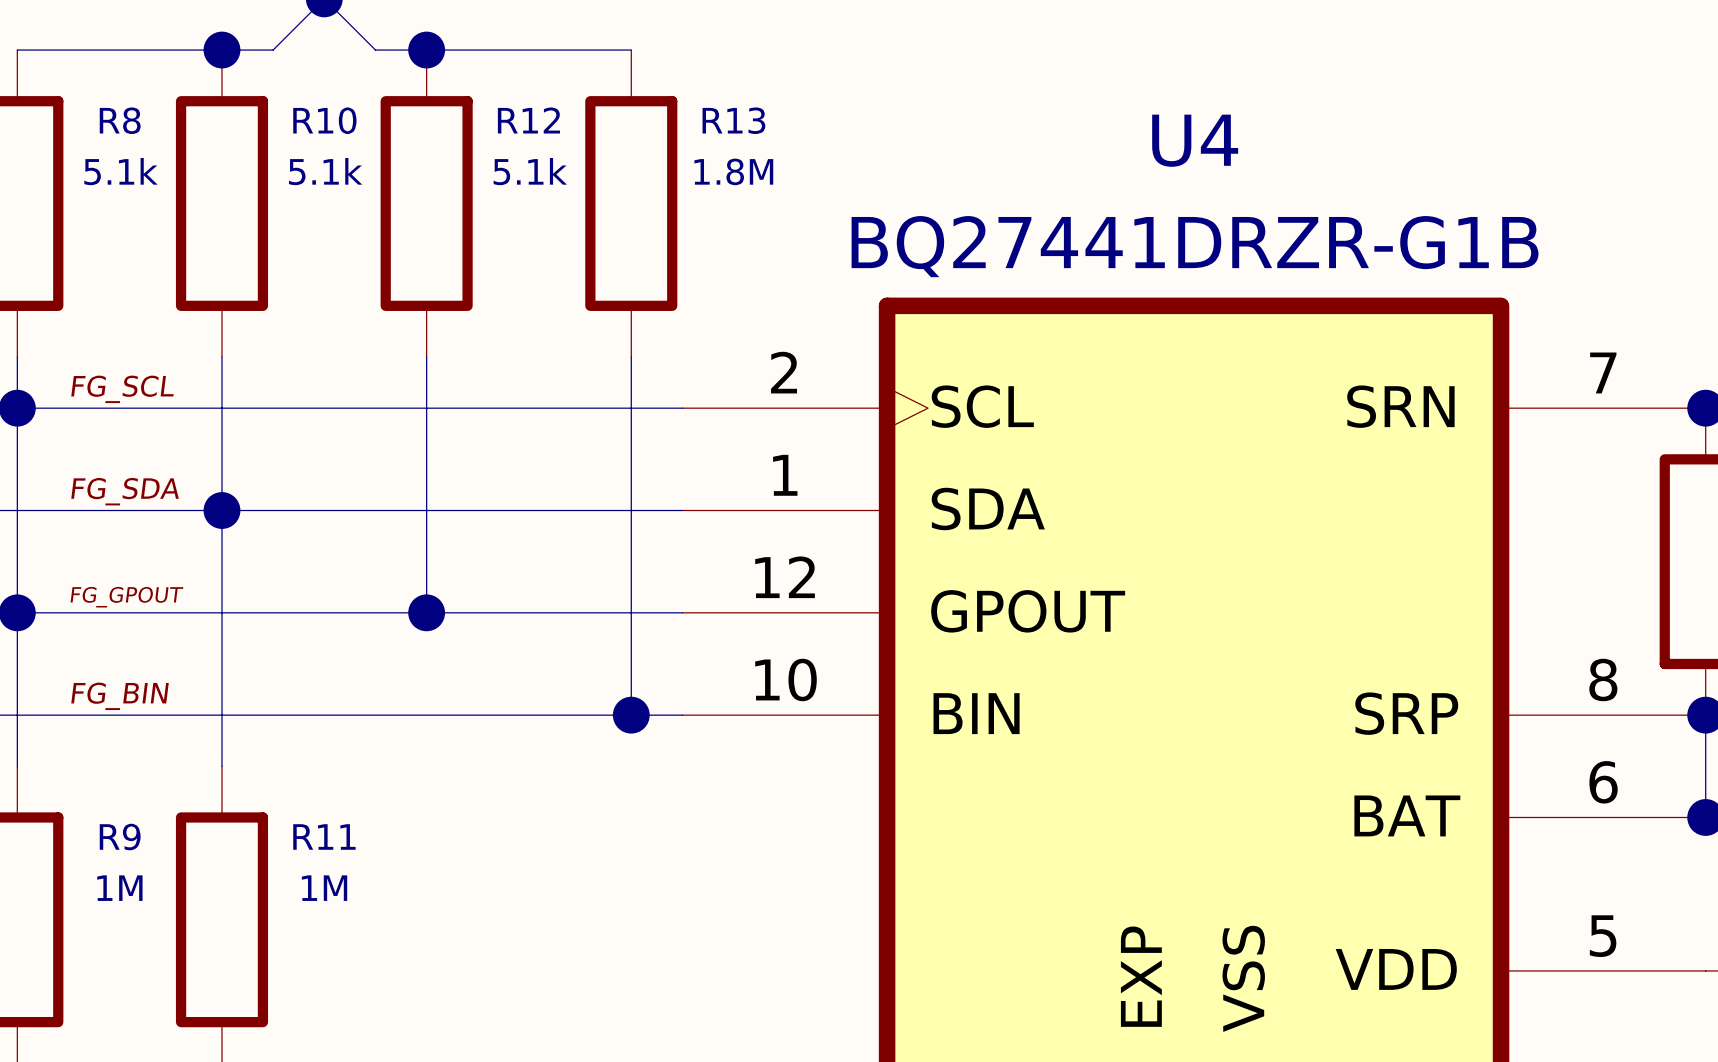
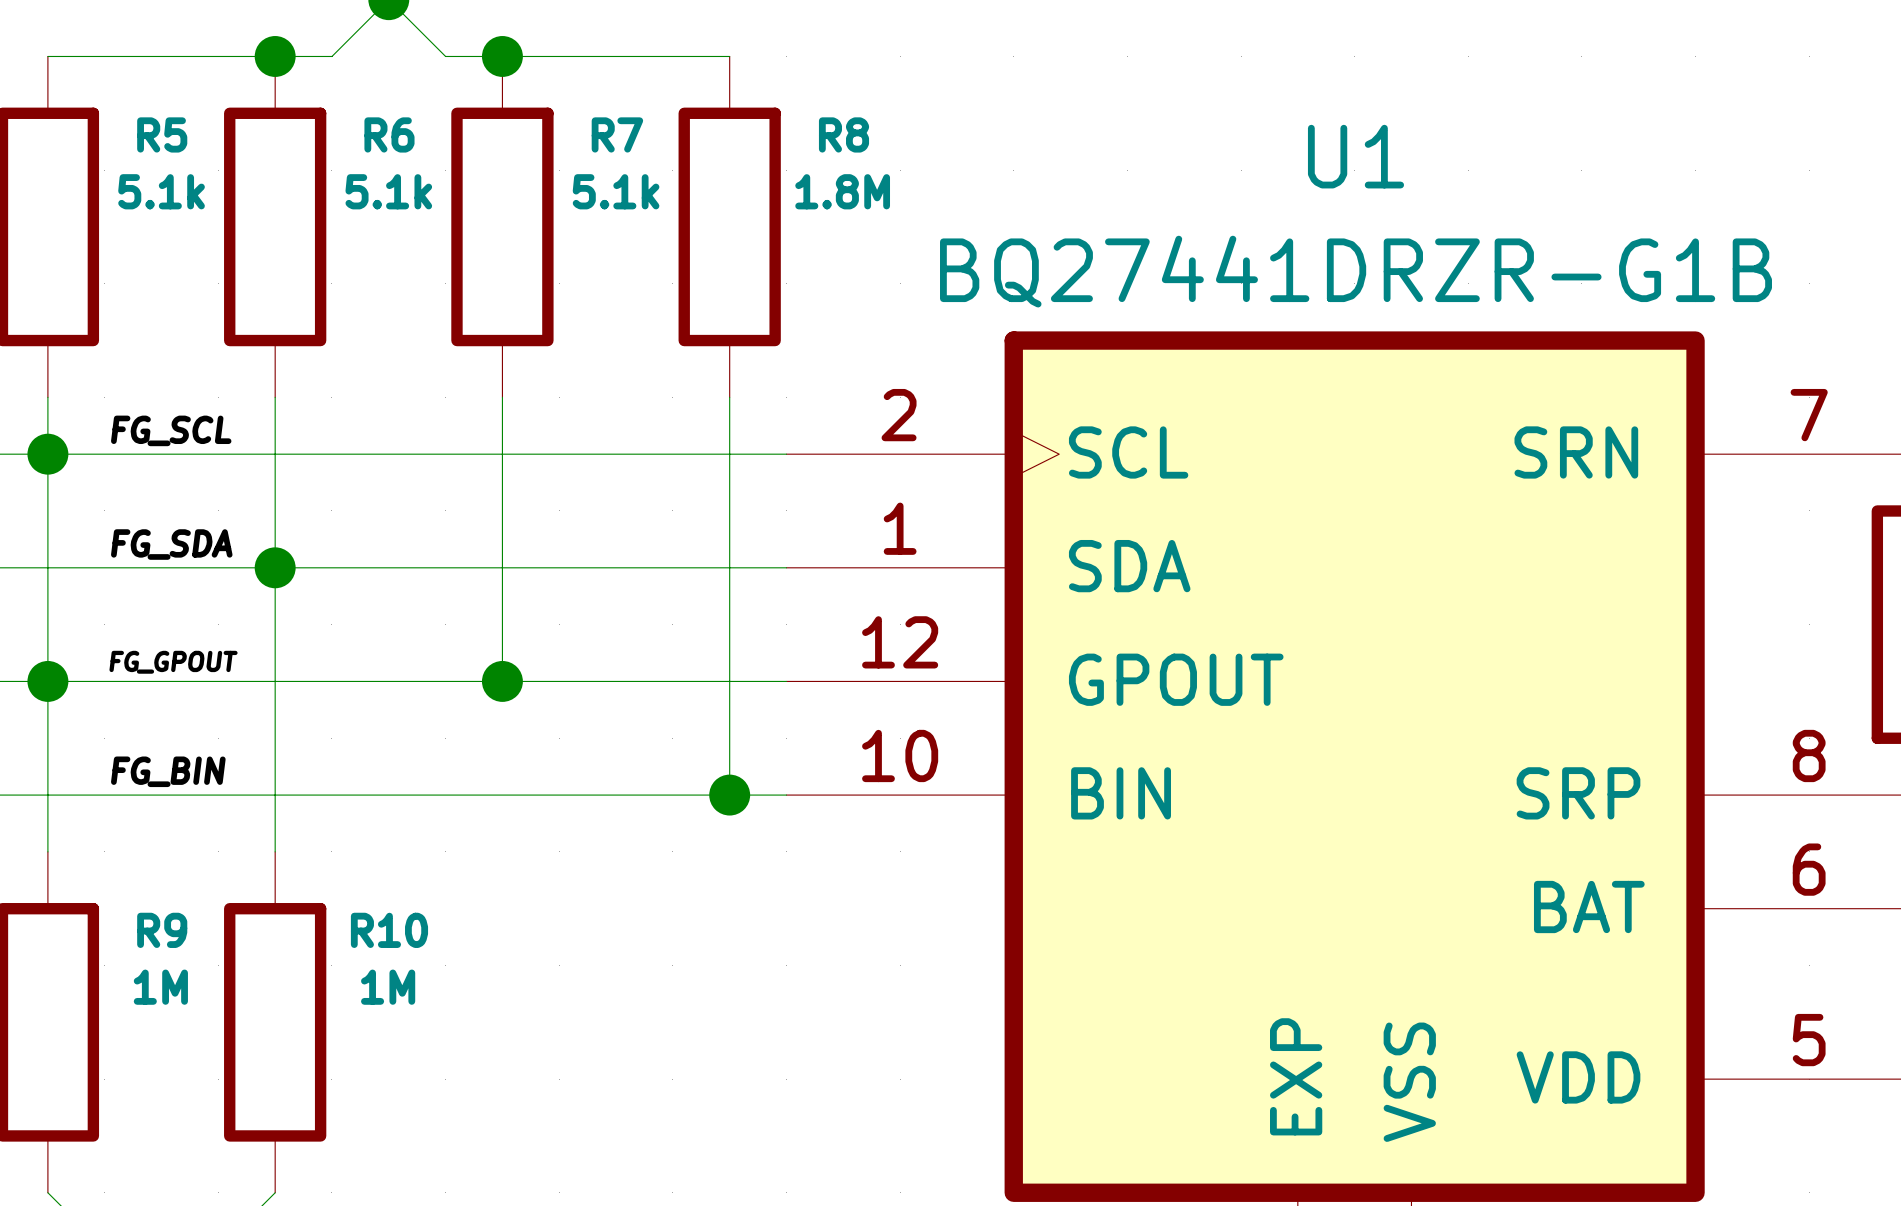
R8 name: R8 (120, 120) -> R5 (162, 134)
R10 name: R10 (324, 120) -> R6 (389, 134)
R12 name: R12 (528, 120) -> R7 (617, 134)
R13 name: R13 (733, 120) -> R8 (843, 134)
U4 name: U4 (1195, 140) -> U1 (1356, 156)
R11 name: R11 (324, 836) -> R10 (389, 930)

